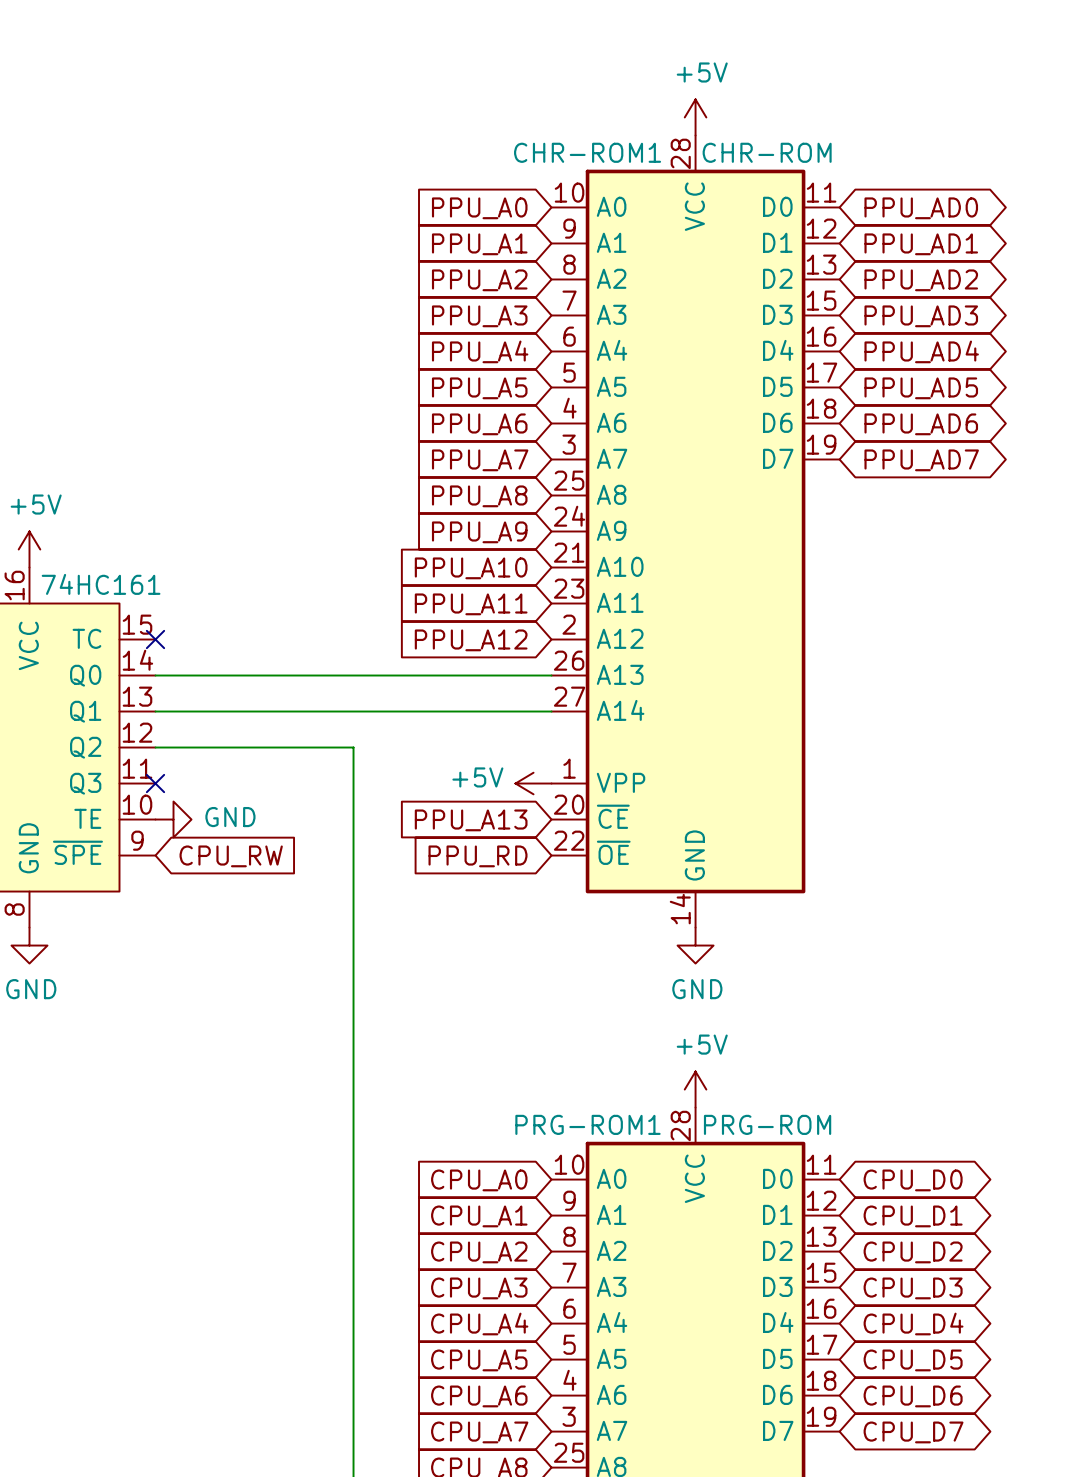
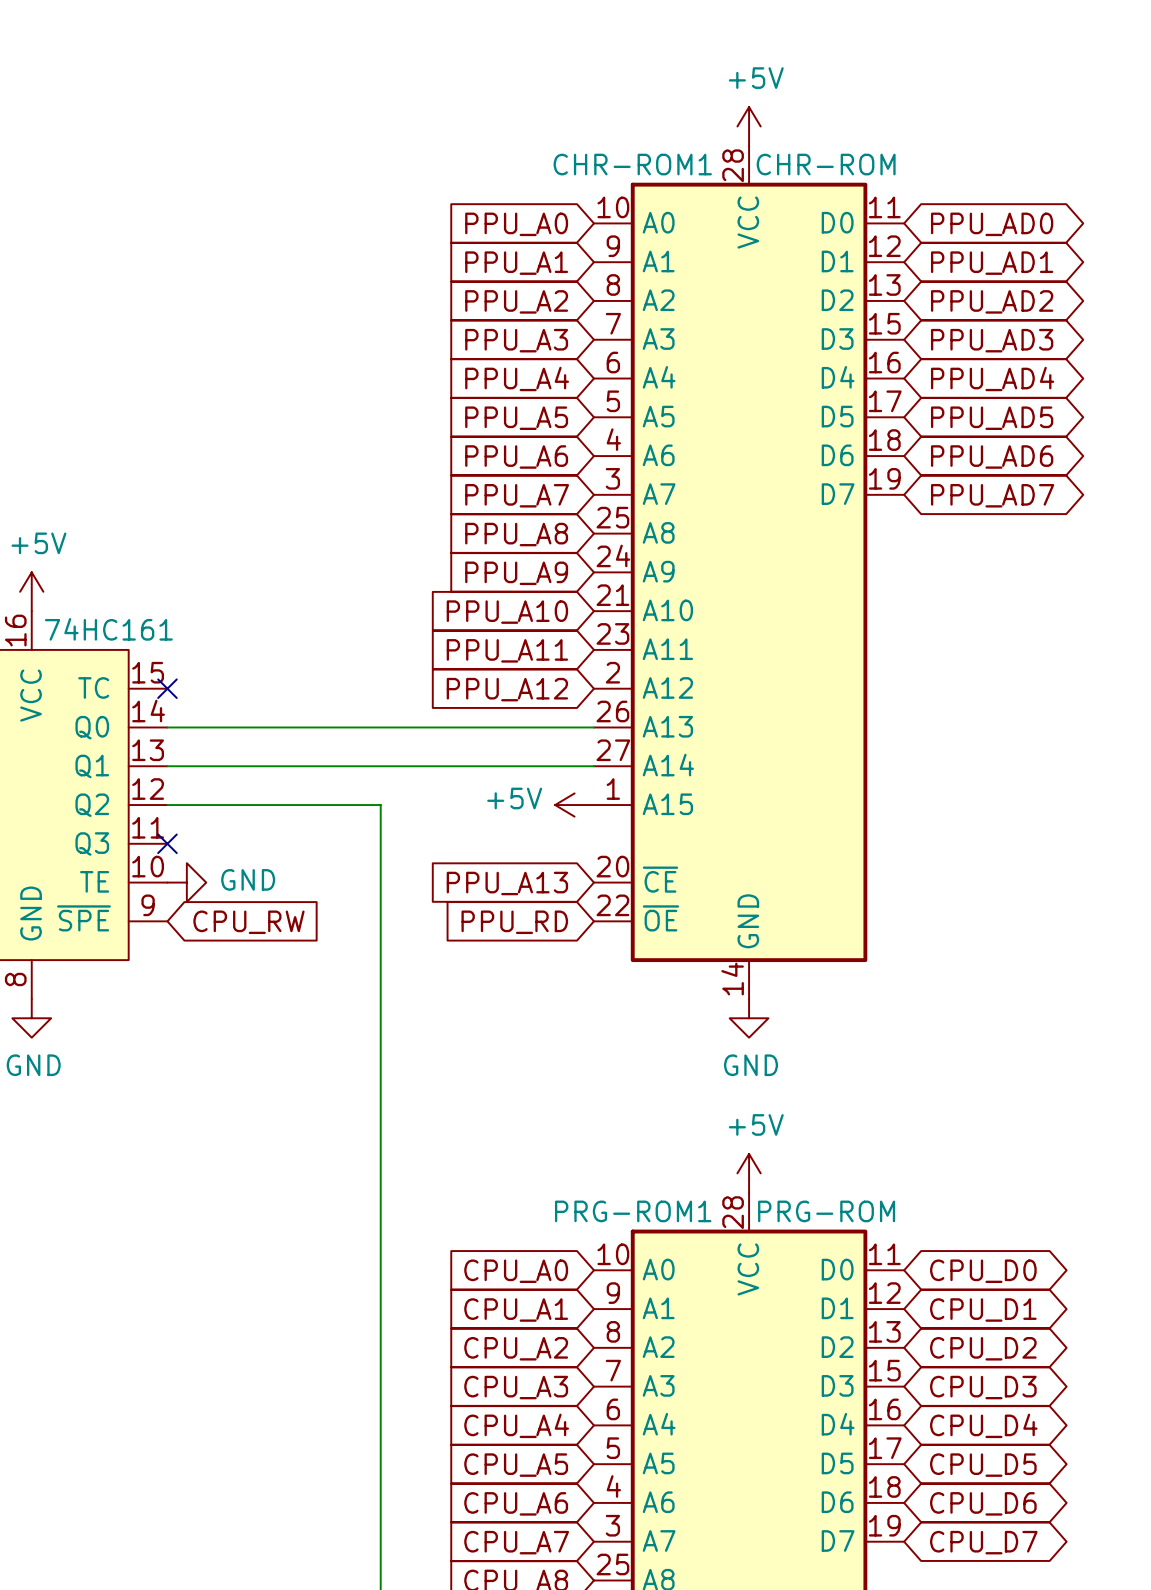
CHR-ROM1 symbol: [551, 135, 840, 928] -> [593, 145, 905, 999]
power symbol position: +5V (533, 783) -> +5V (574, 805)

